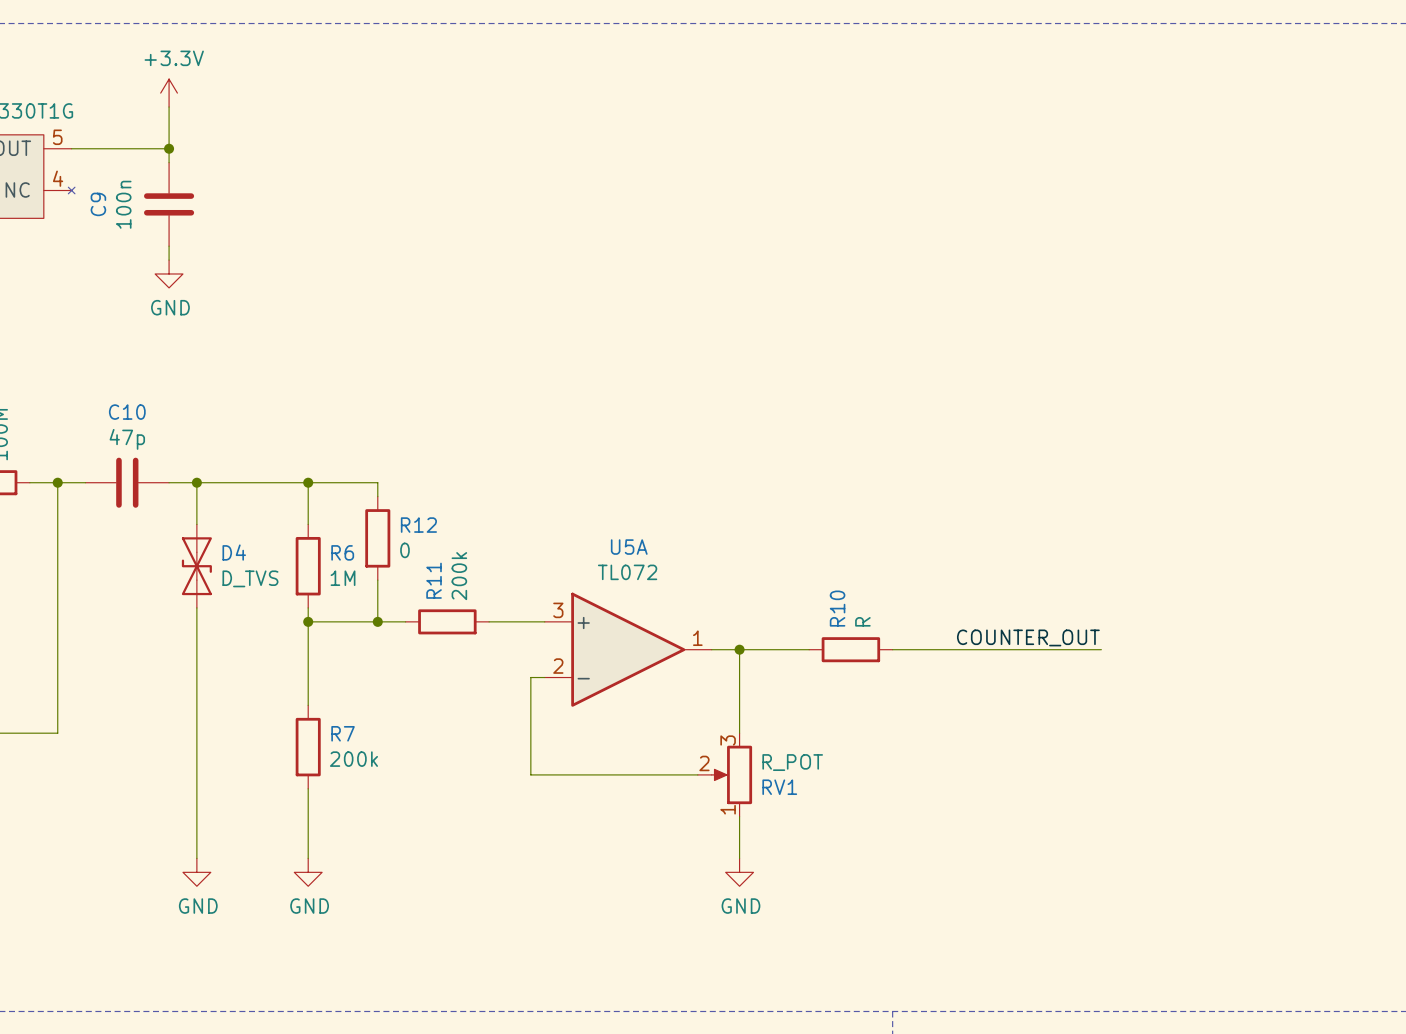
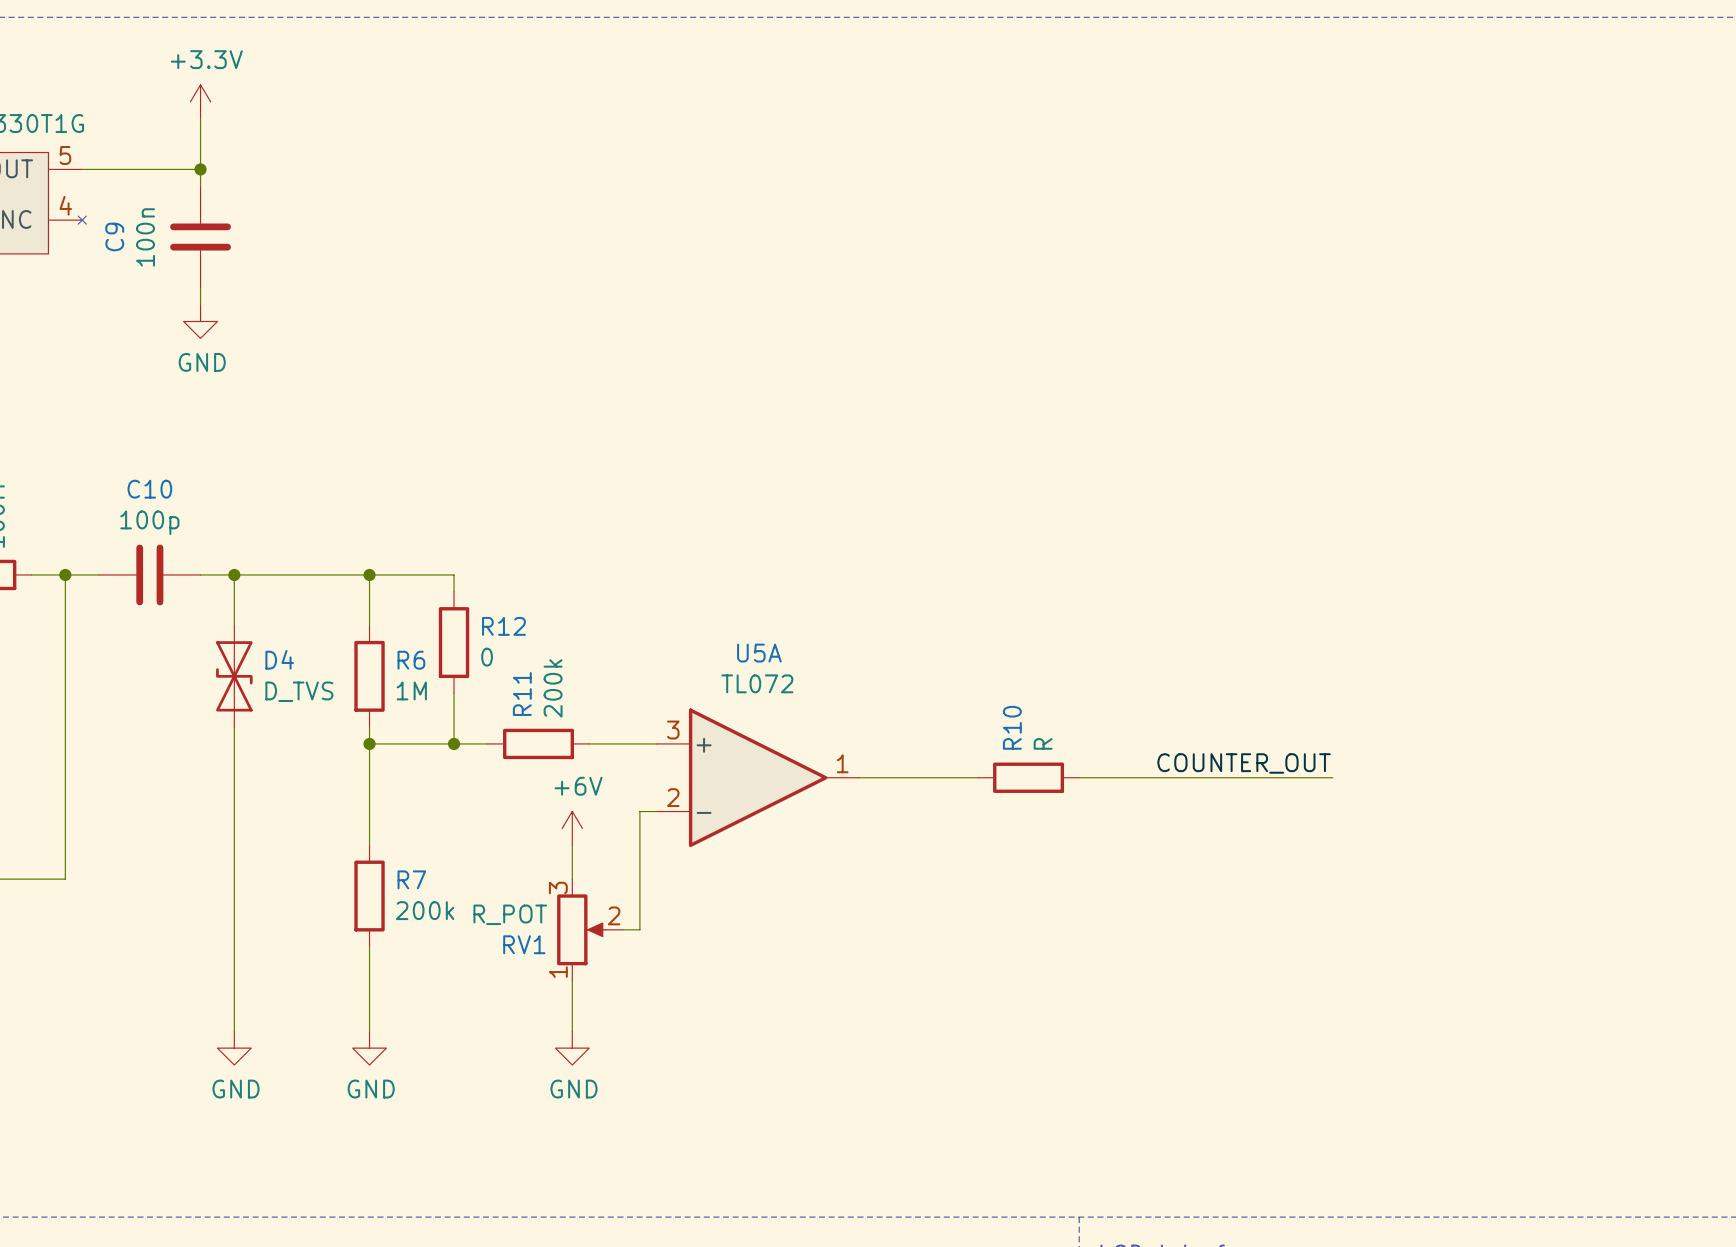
C10 value: 47p (127, 439) -> 100p (149, 522)
wire: (739, 649) (739, 733) -> none
junction: (739, 649) -> none
power symbol: none -> +6V (572, 828)
wire: none -> (572, 845) (572, 879)
wire: (530, 774) (697, 774) -> (639, 929) (623, 929)
RV1 position: (724, 774) -> (590, 929)
RV1 flip: as is (731, 774) -> left-right (581, 929)
wire: (739, 816) (739, 858) -> (572, 980) (572, 1031)
power symbol position: GND (739, 872) -> GND (572, 1048)

